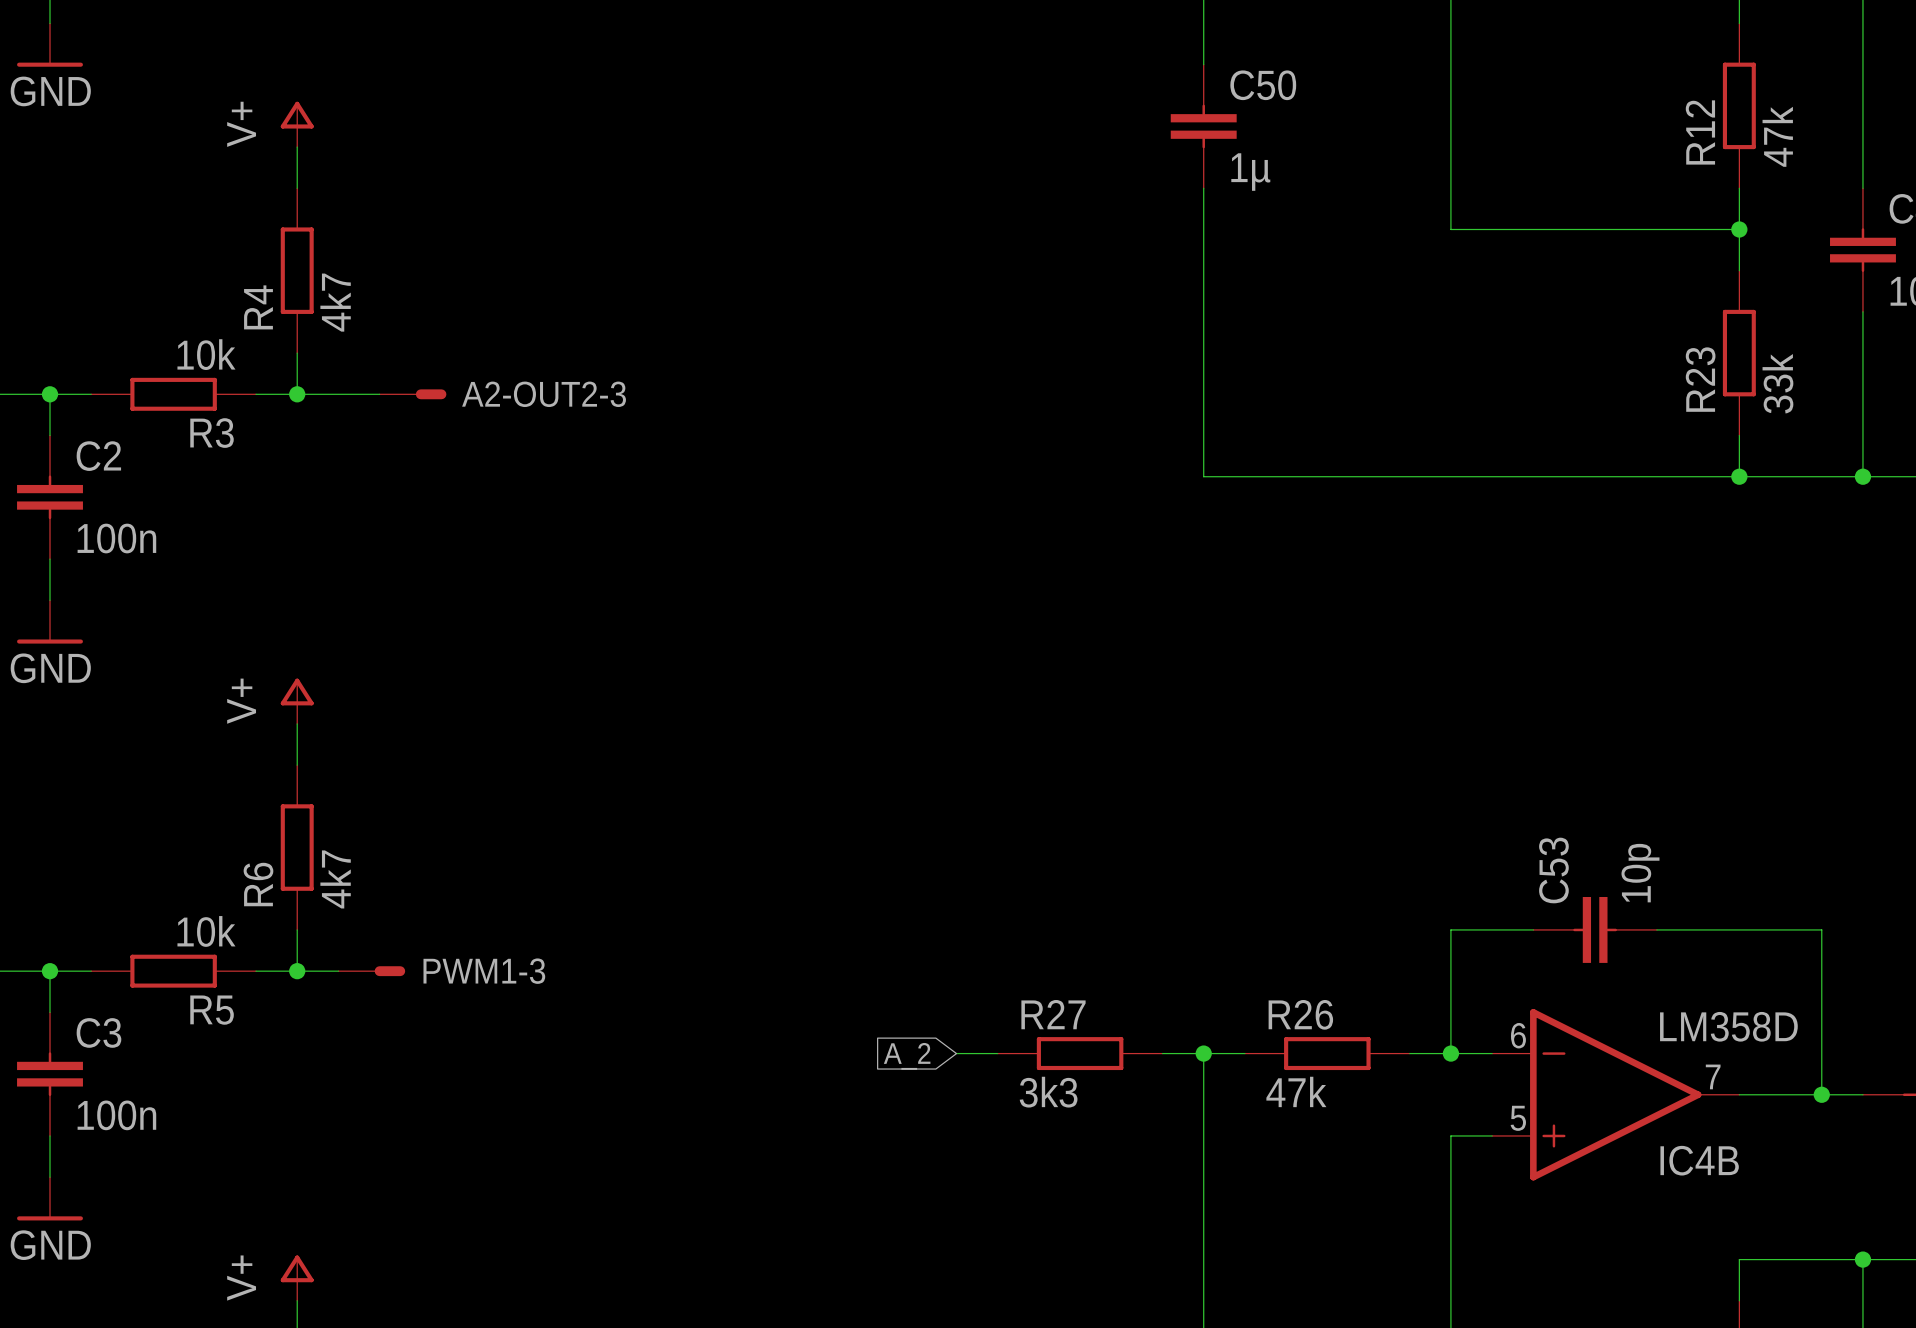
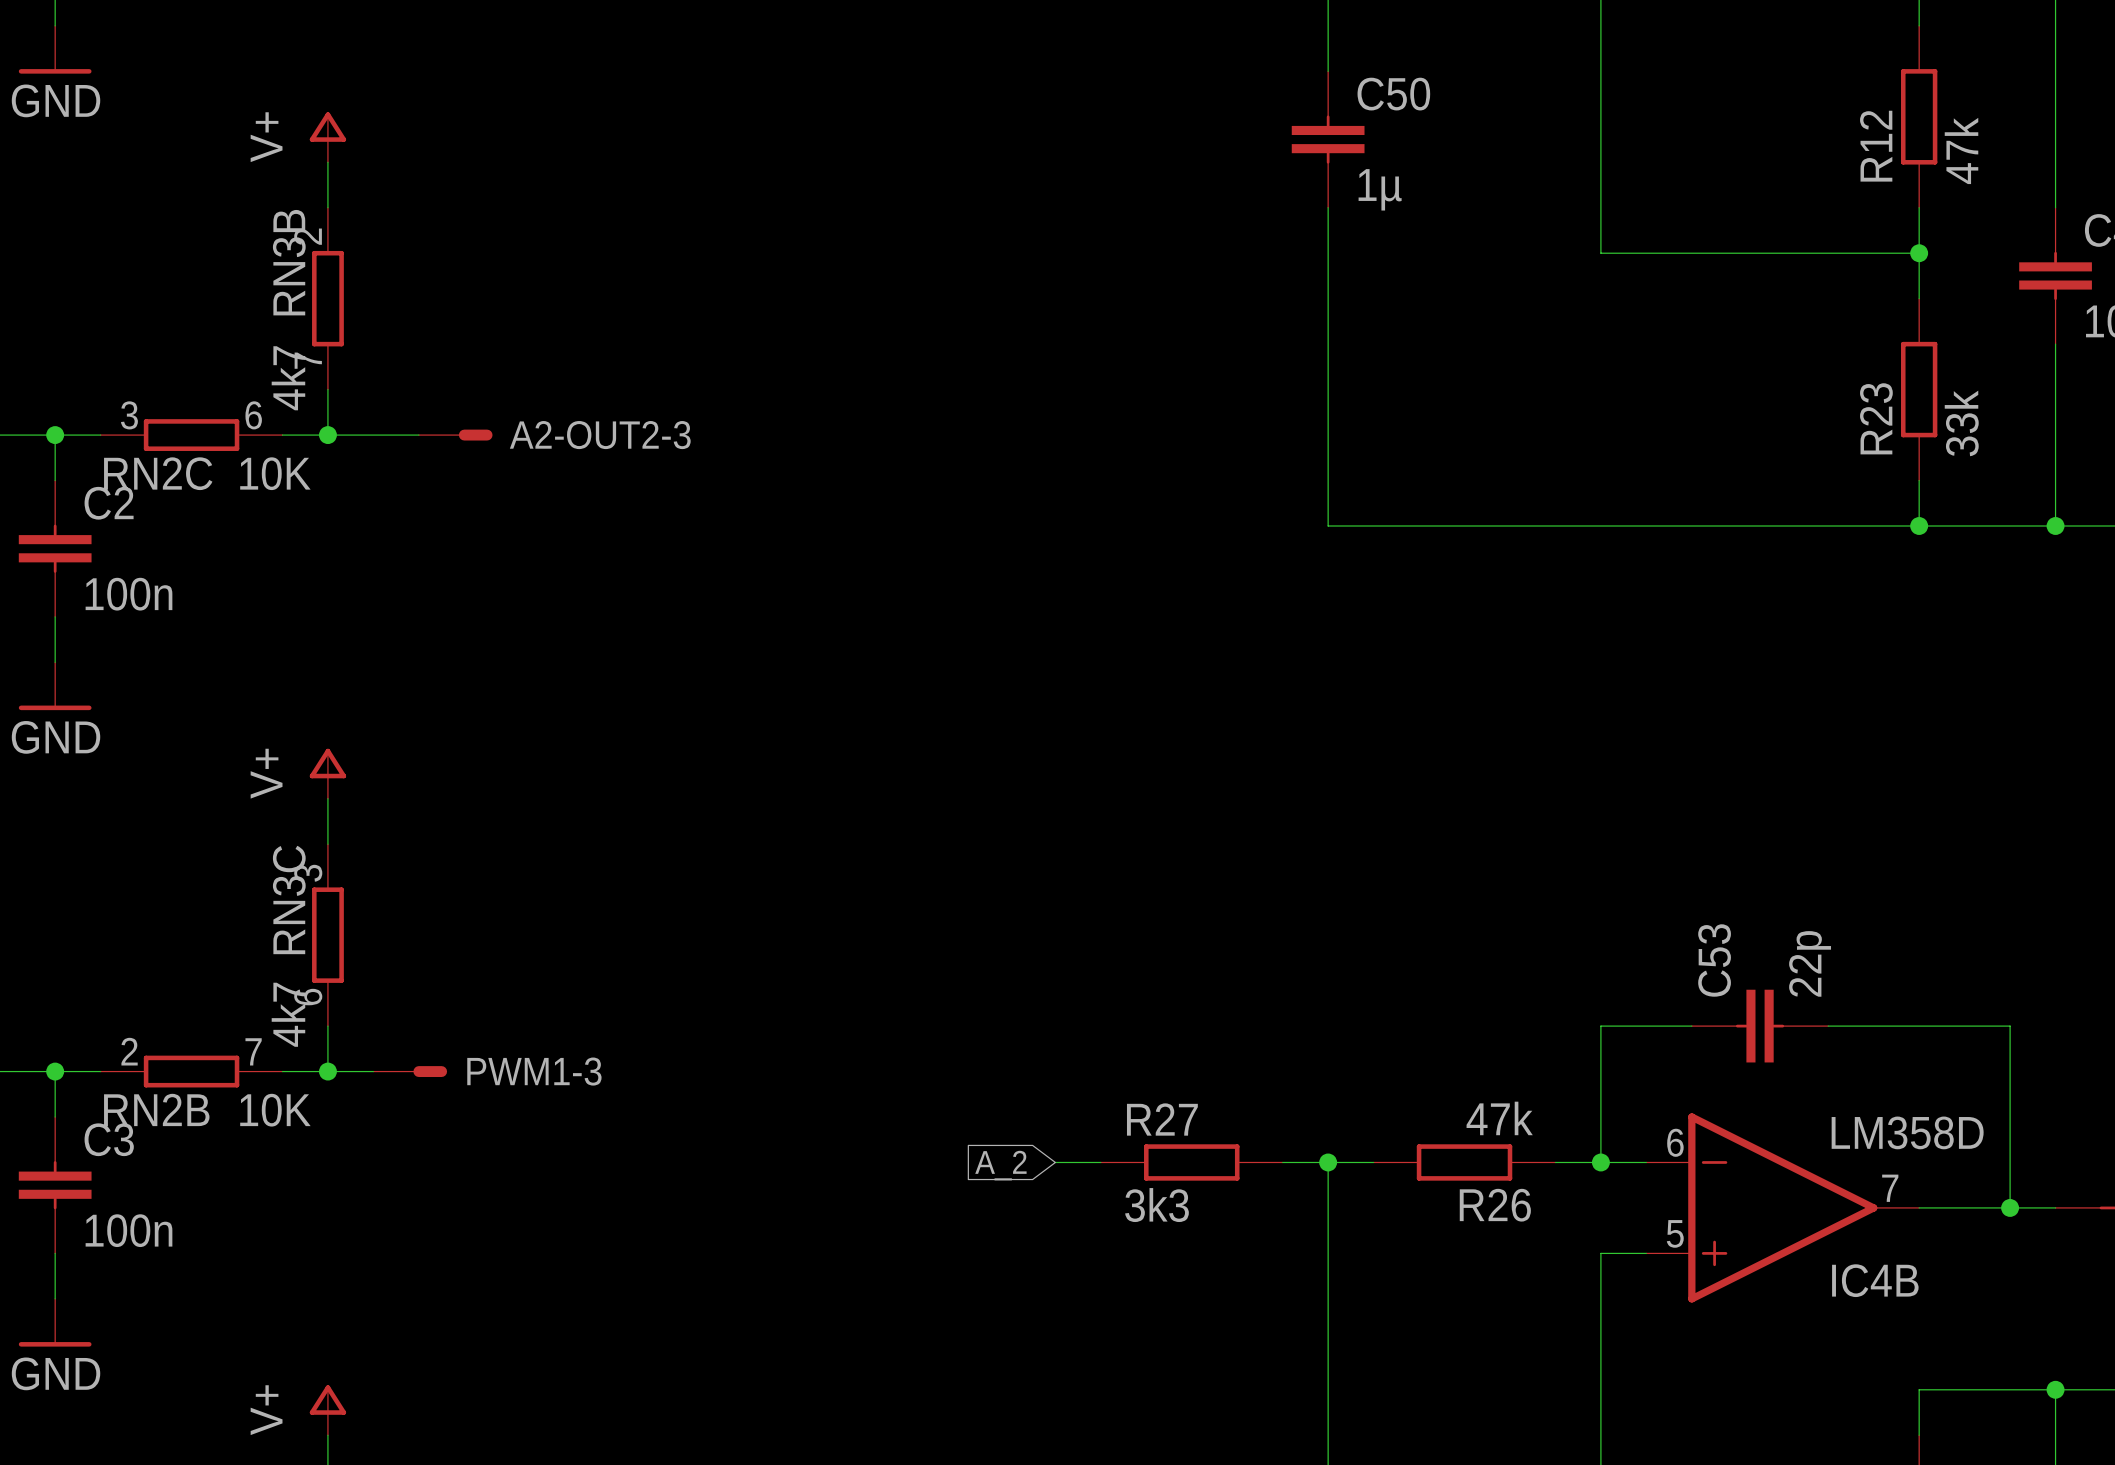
R4: 4k7 (297, 270) -> none
RN3B: none -> 4k7 (327, 298)
R3: 10k (173, 394) -> none
RN2C: none -> 10K (191, 435)
R6: 4k7 (297, 847) -> none
RN3C: none -> 4k7 (327, 935)
C53 value: 10p (1640, 873) -> 22p (1810, 963)
R5: 10k (173, 971) -> none
RN2B: none -> 10K (191, 1071)
R26 name position: R26 (1300, 1014) -> R26 (1495, 1205)
R26 value position: 47k (1296, 1091) -> 47k (1499, 1118)

